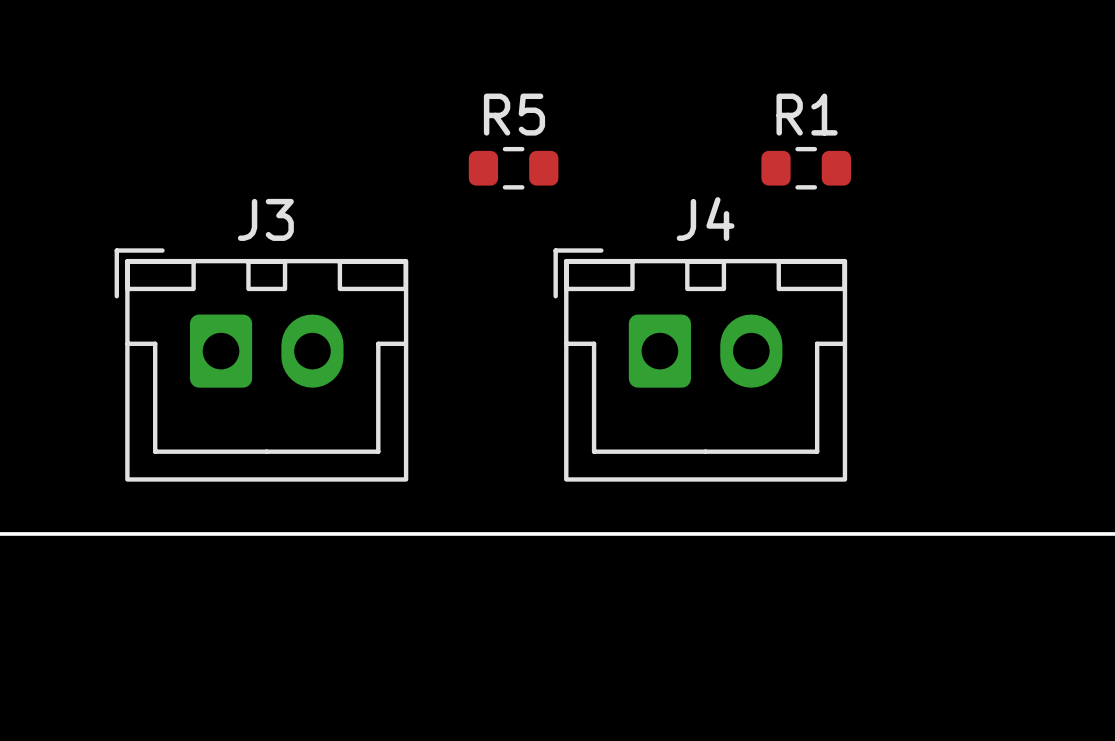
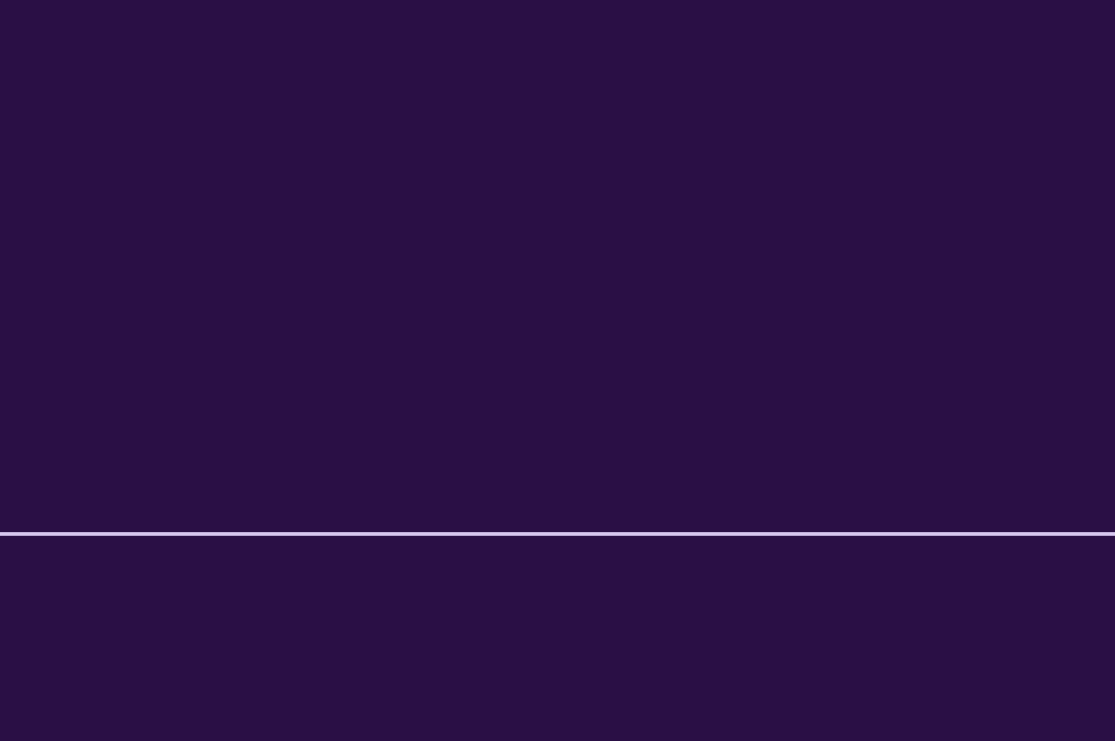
R5: (513, 168) -> none
R1: (806, 168) -> none
J3: (261, 365) -> none
J4: (700, 365) -> none

